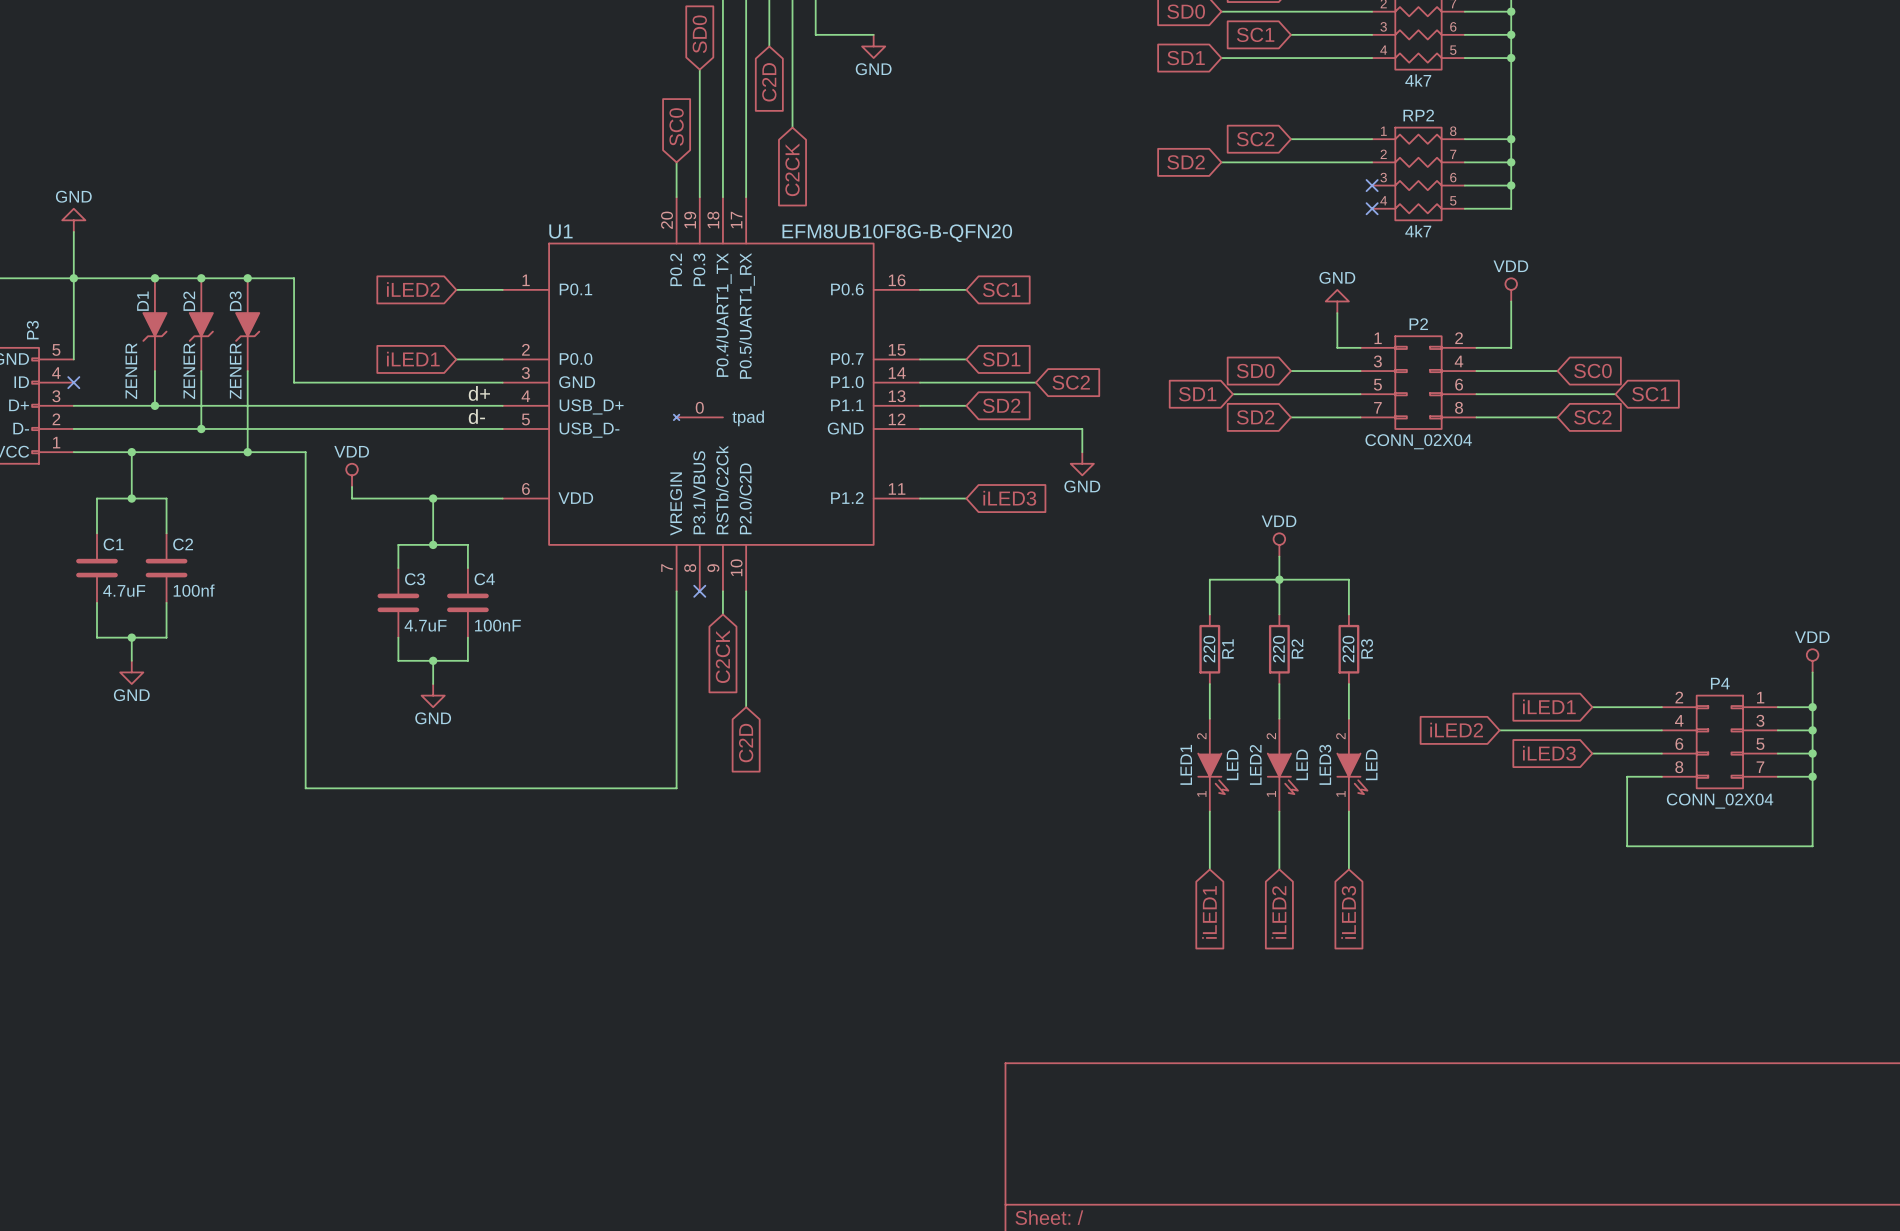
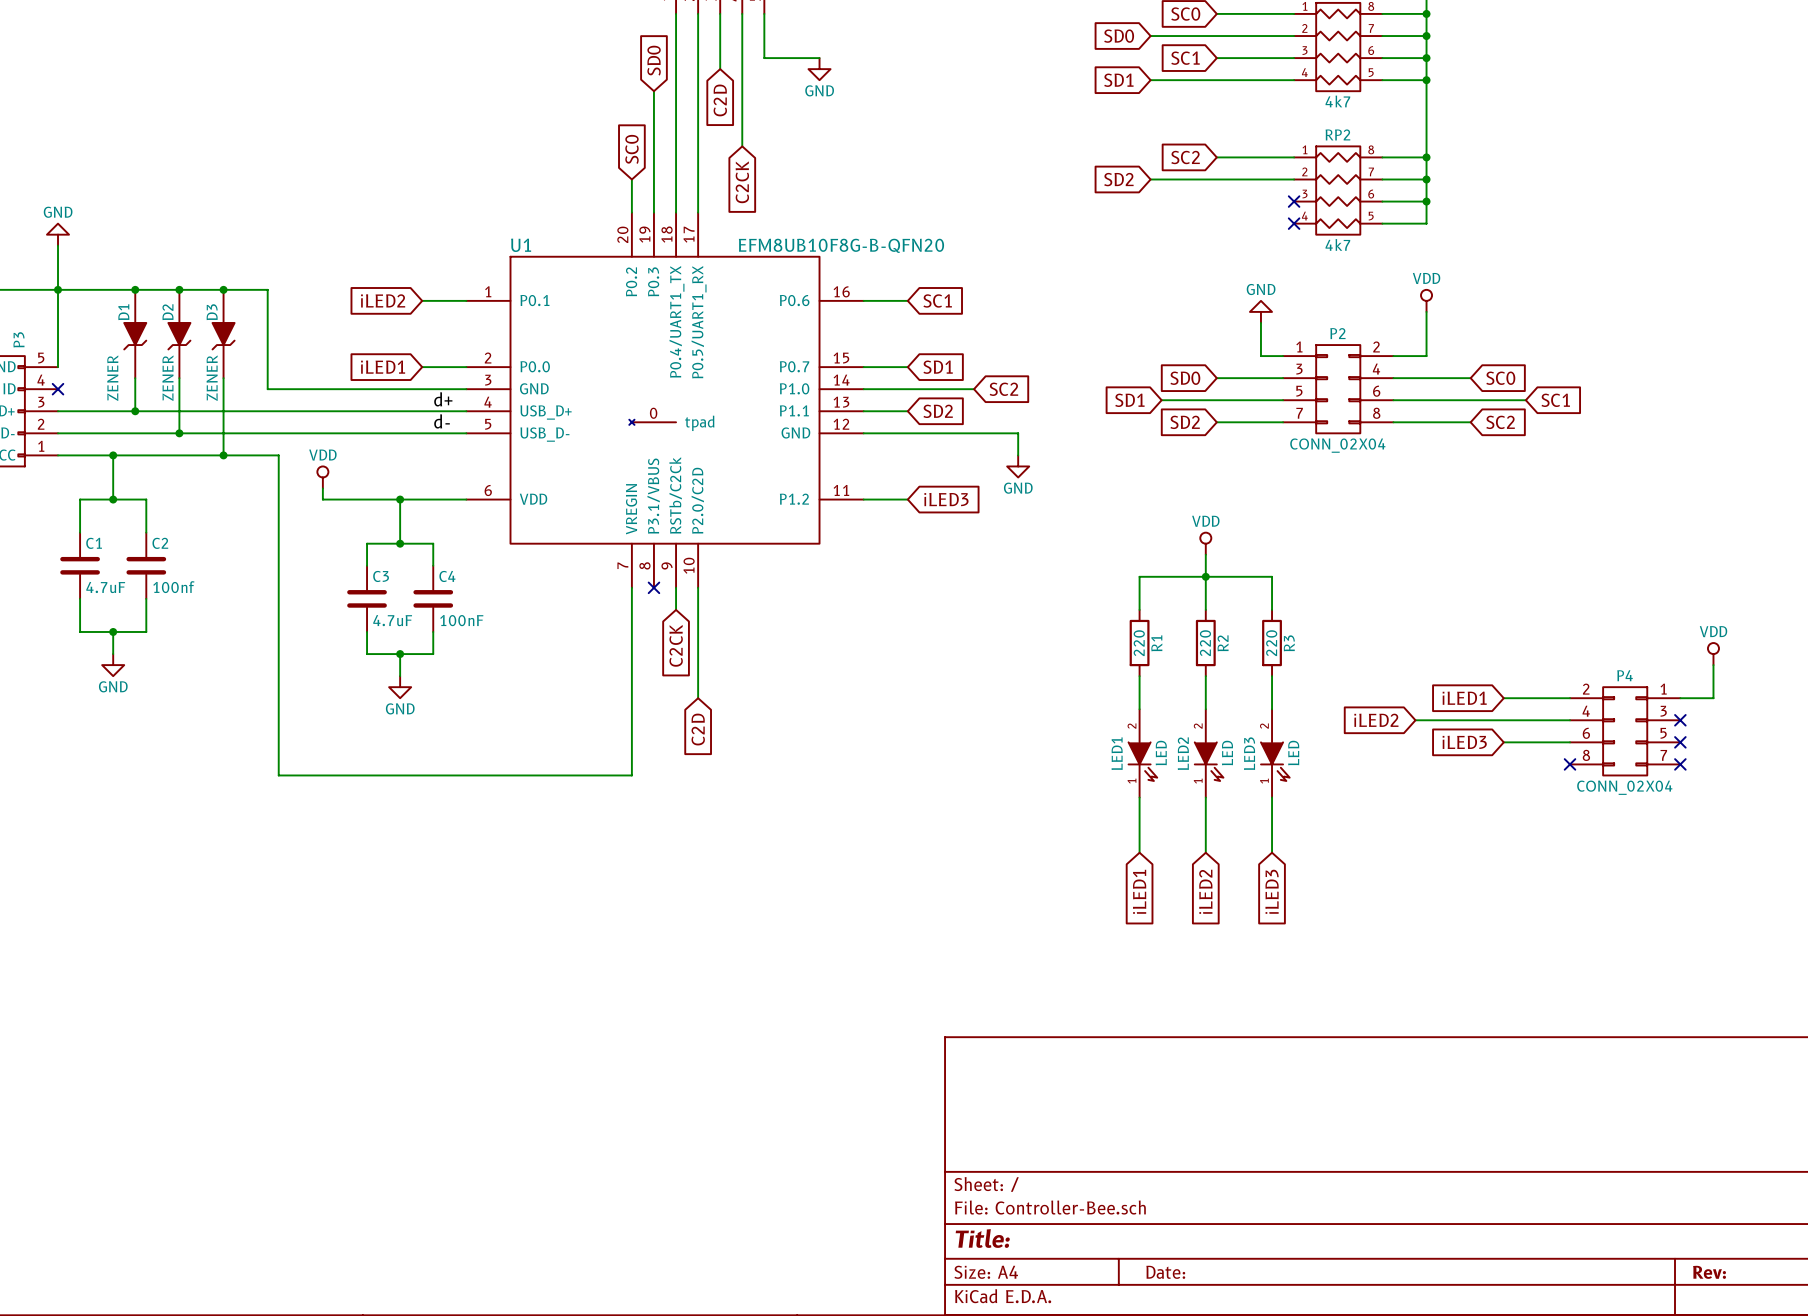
wire: (1812, 707) (1812, 846) (1627, 846) (1627, 776) (1661, 776) -> none
junction: (1812, 707) -> none
wire: (1777, 730) (1812, 730) -> none
no-connect mark: none -> (1680, 720)
junction: (1812, 730) -> none
wire: (1777, 753) (1812, 753) -> none
no-connect mark: none -> (1680, 742)
junction: (1812, 753) -> none
no-connect mark: none -> (1570, 764)
wire: (1777, 776) (1812, 776) -> none
no-connect mark: none -> (1680, 764)
junction: (1812, 776) -> none

